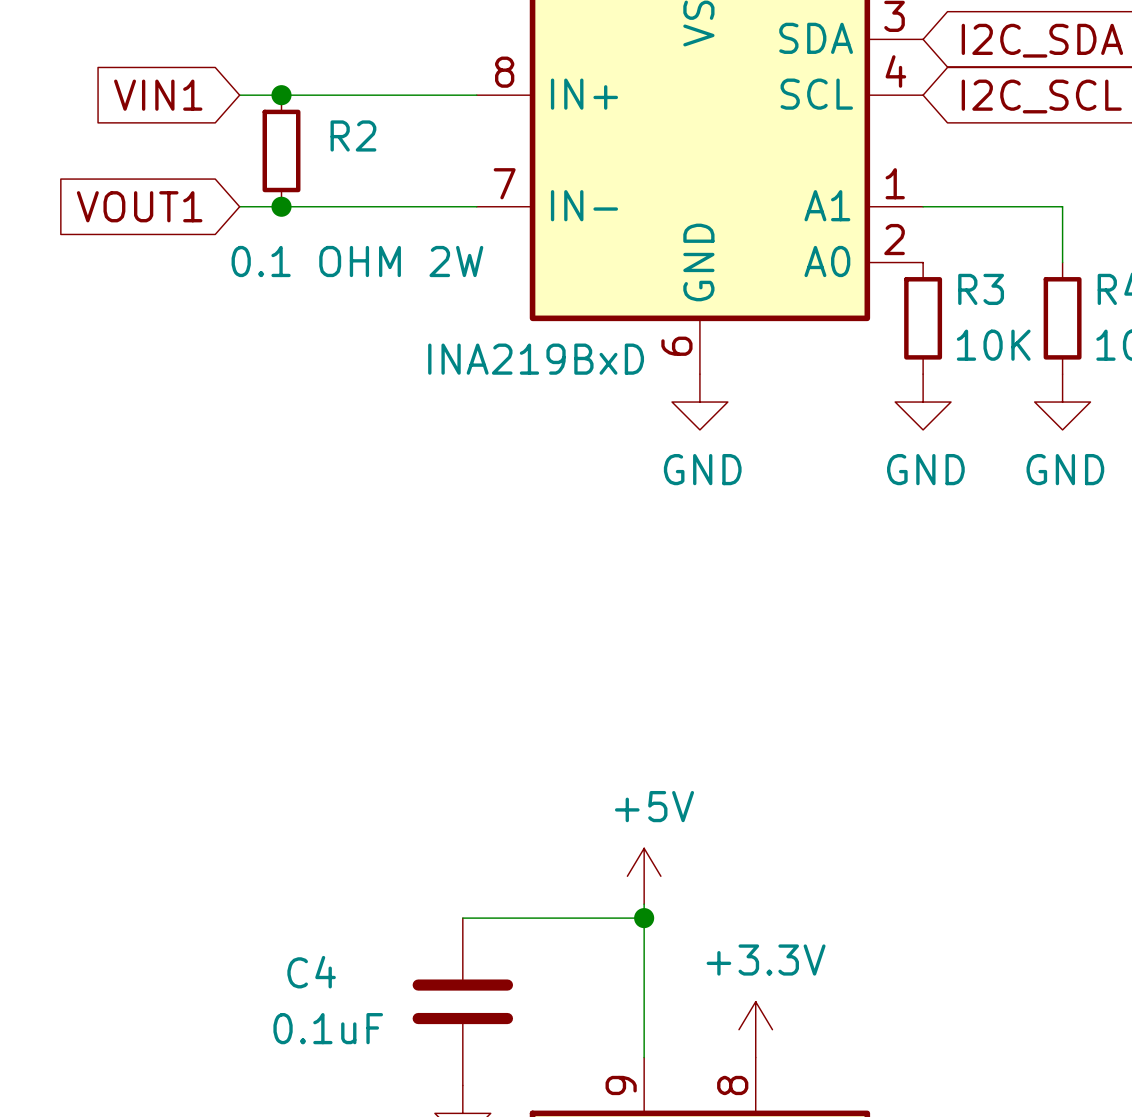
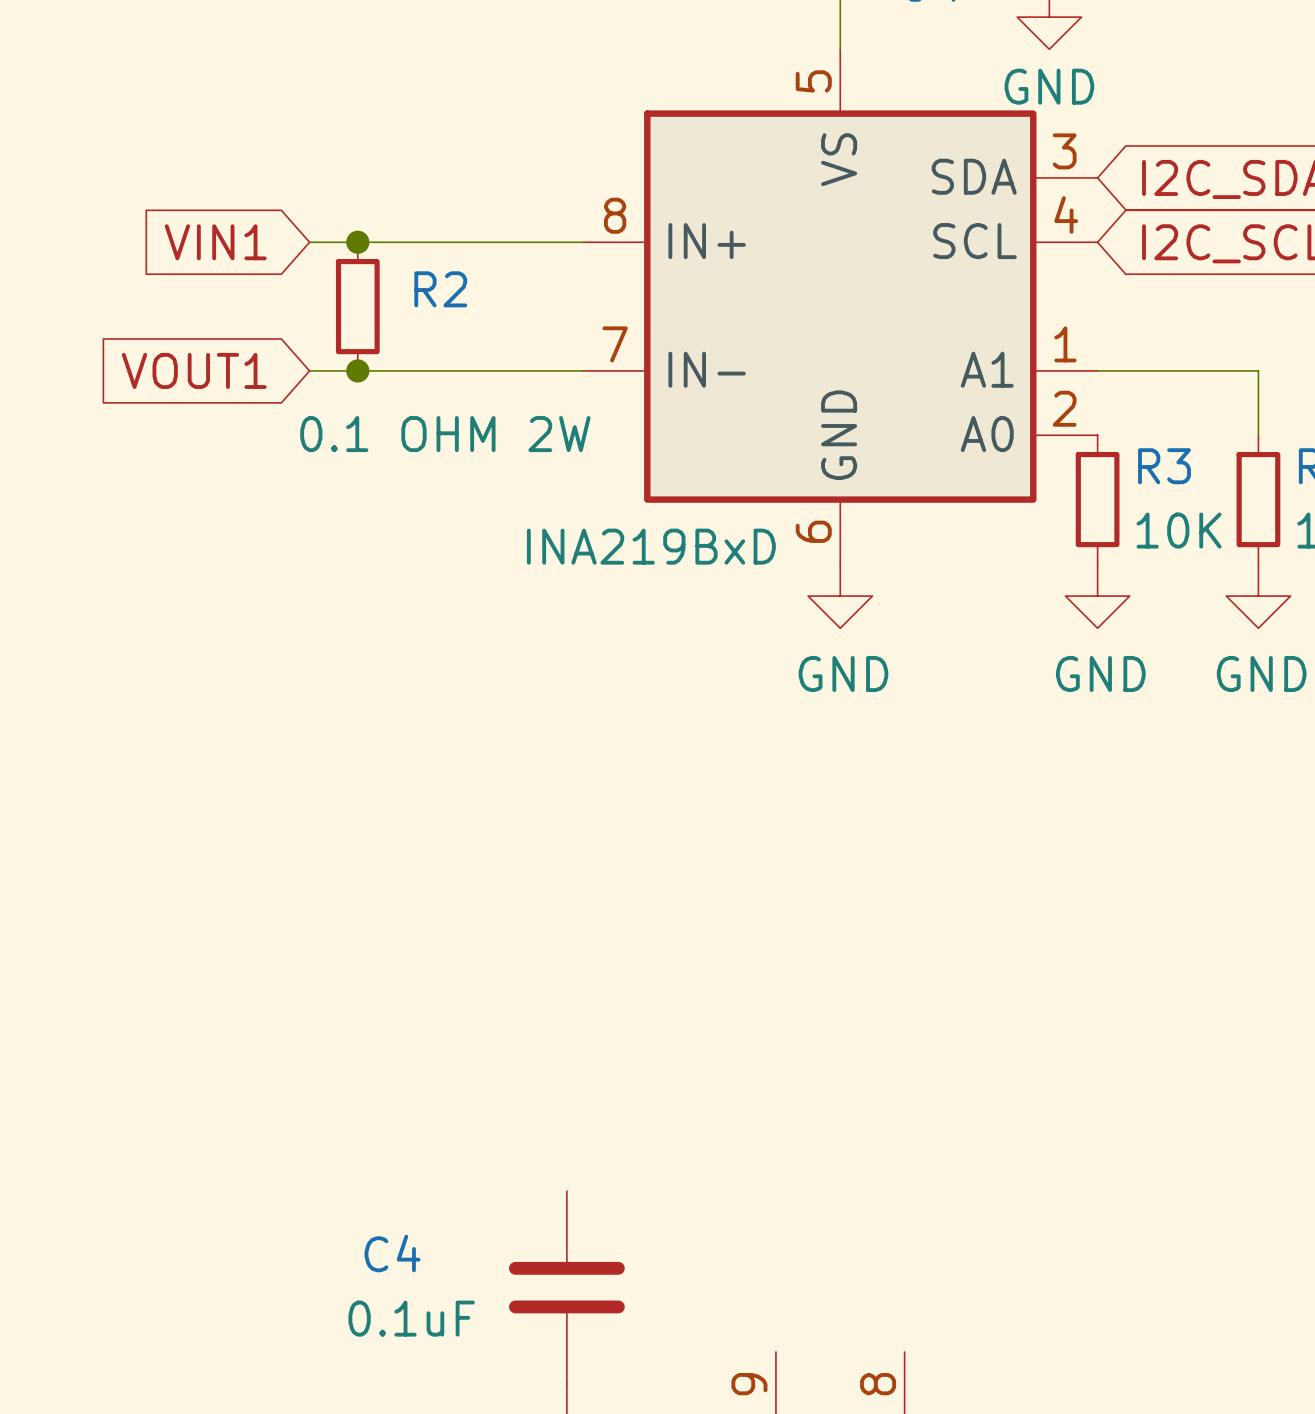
power symbol: +5V (644, 876) -> none
wire: (644, 904) (644, 1057) -> none
wire: (462, 918) (644, 918) -> none
junction: (644, 918) -> none
power symbol: +3.3V (755, 1029) -> none

